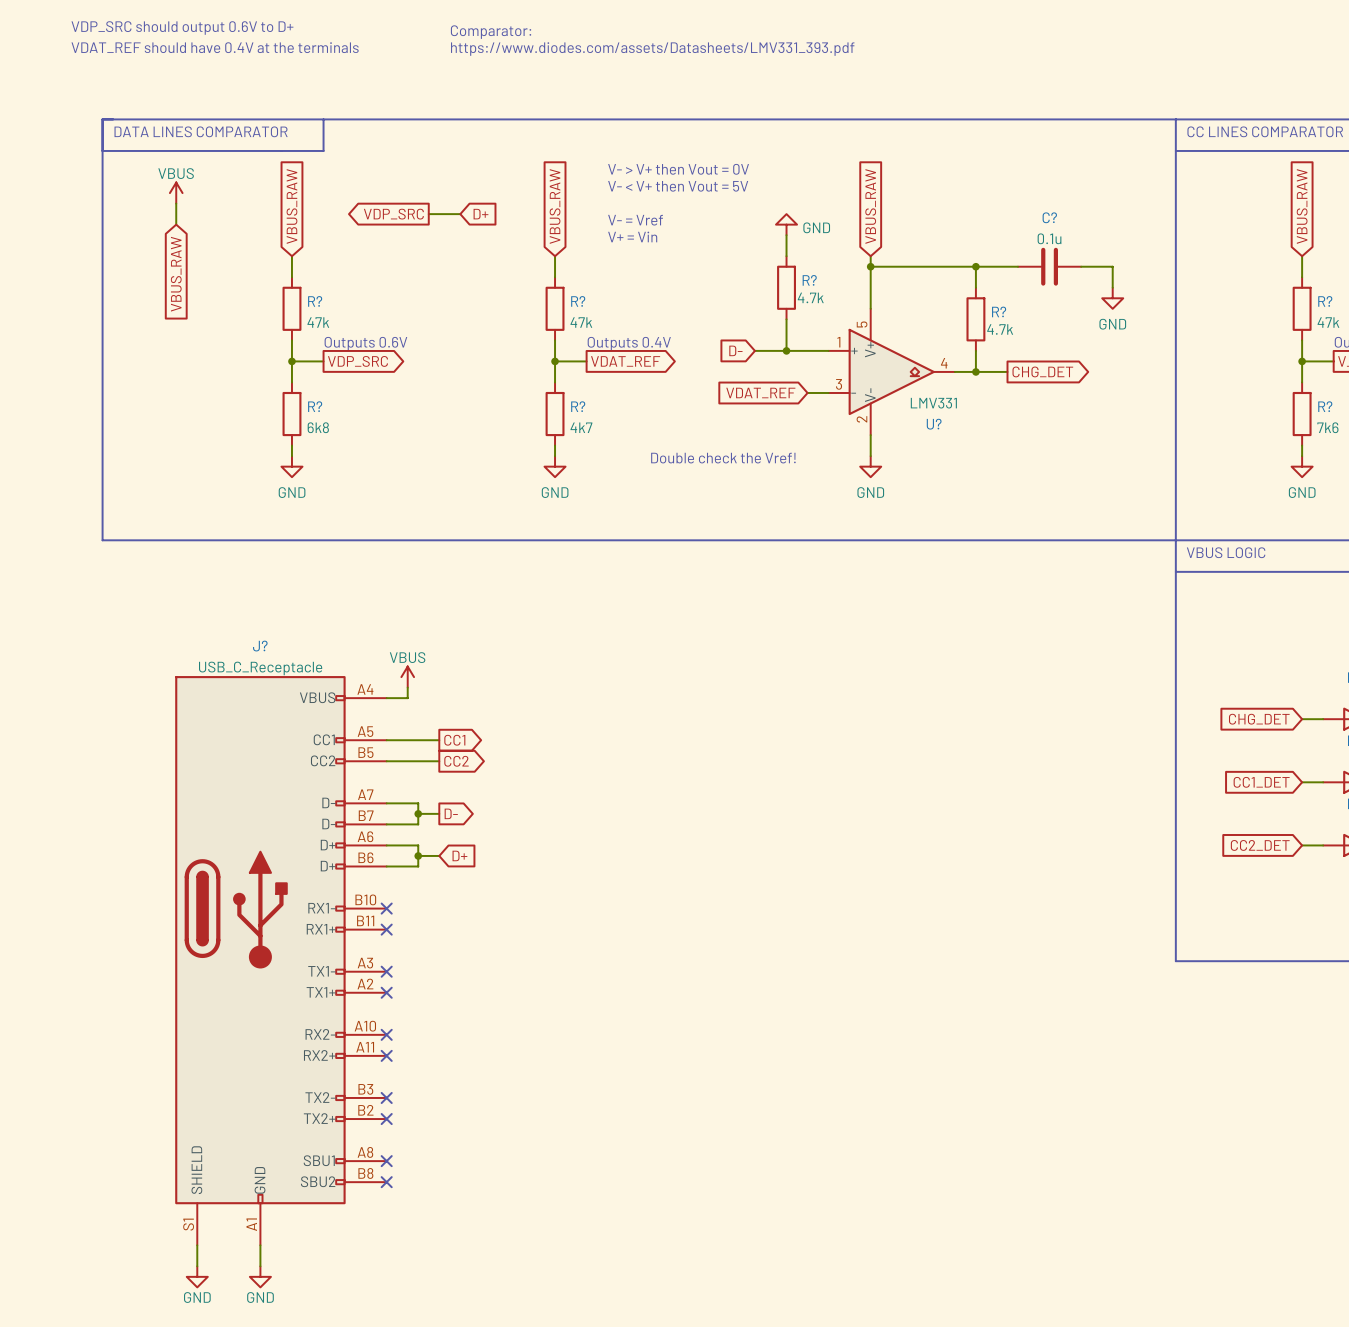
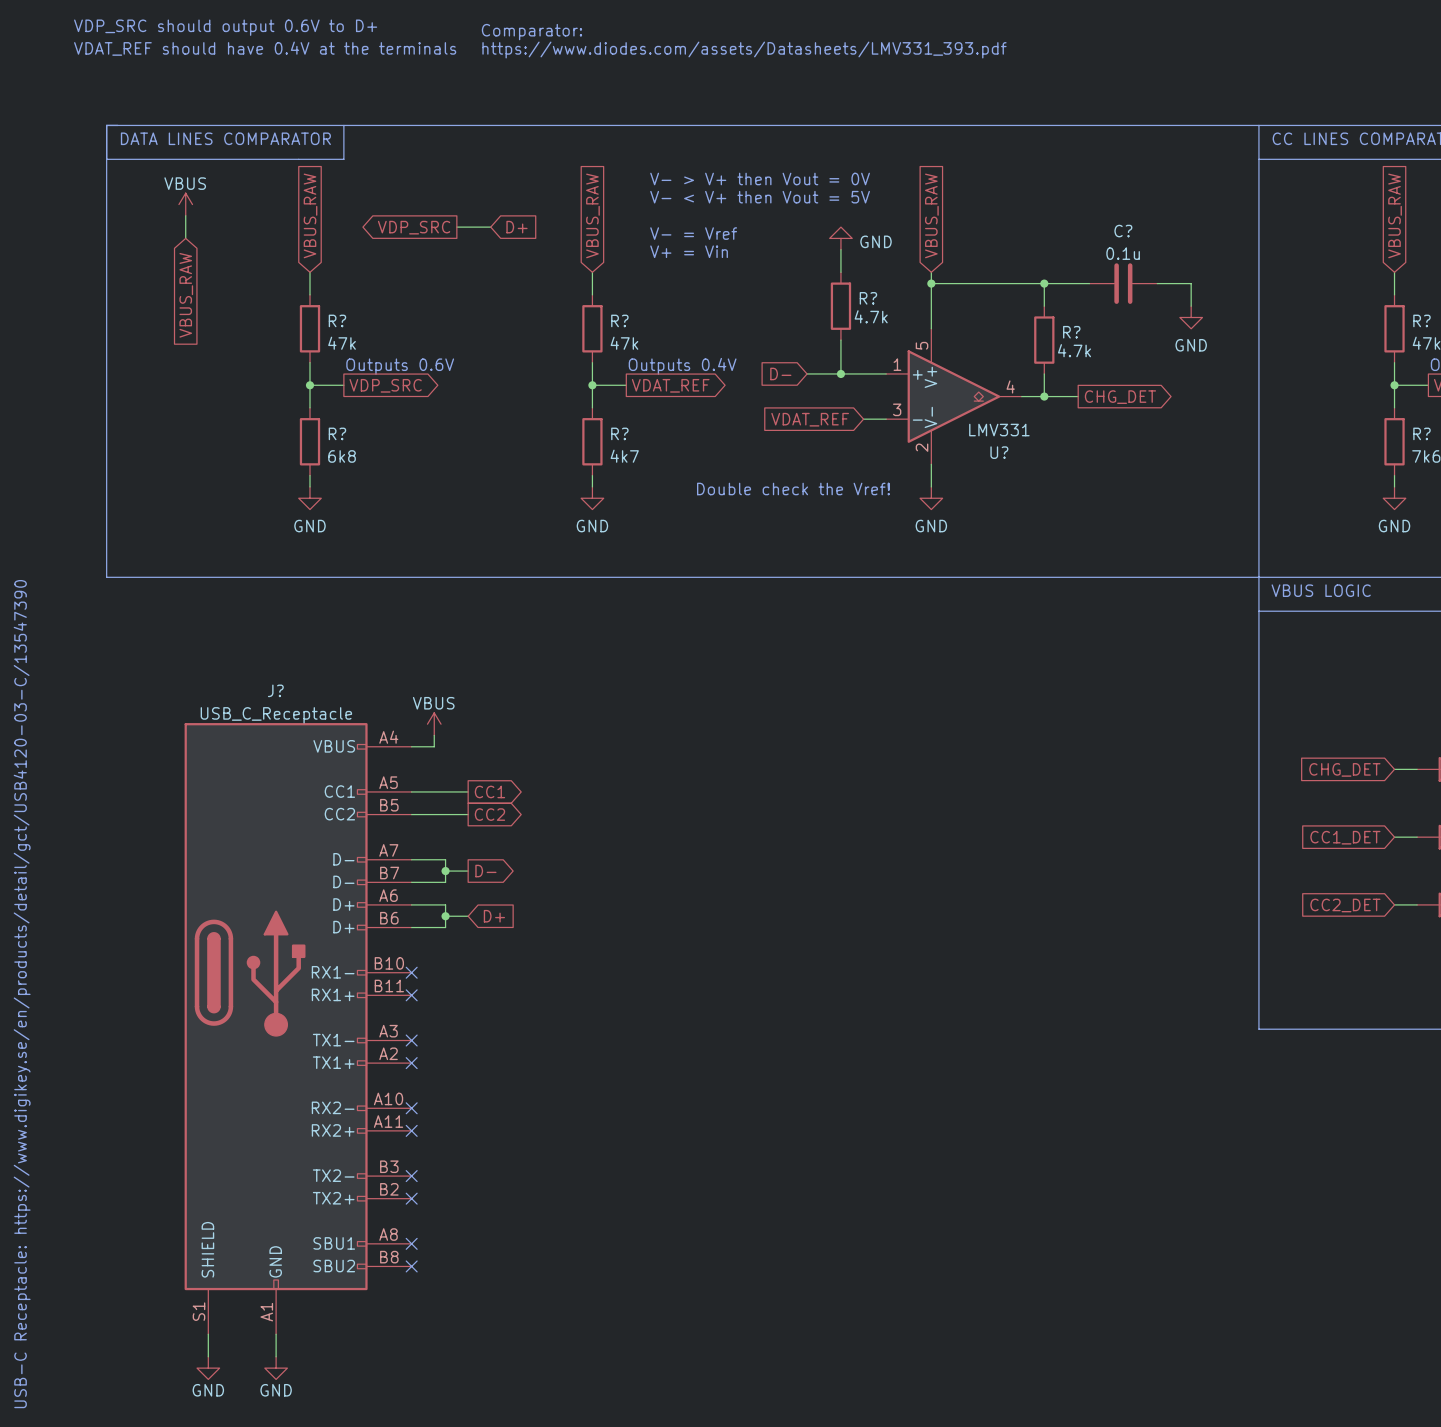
text: none -> USB-C Receptacle: https://www.digikey.se/en/products/detail/gct/USB4120-03-C/13547390 (22, 994)

